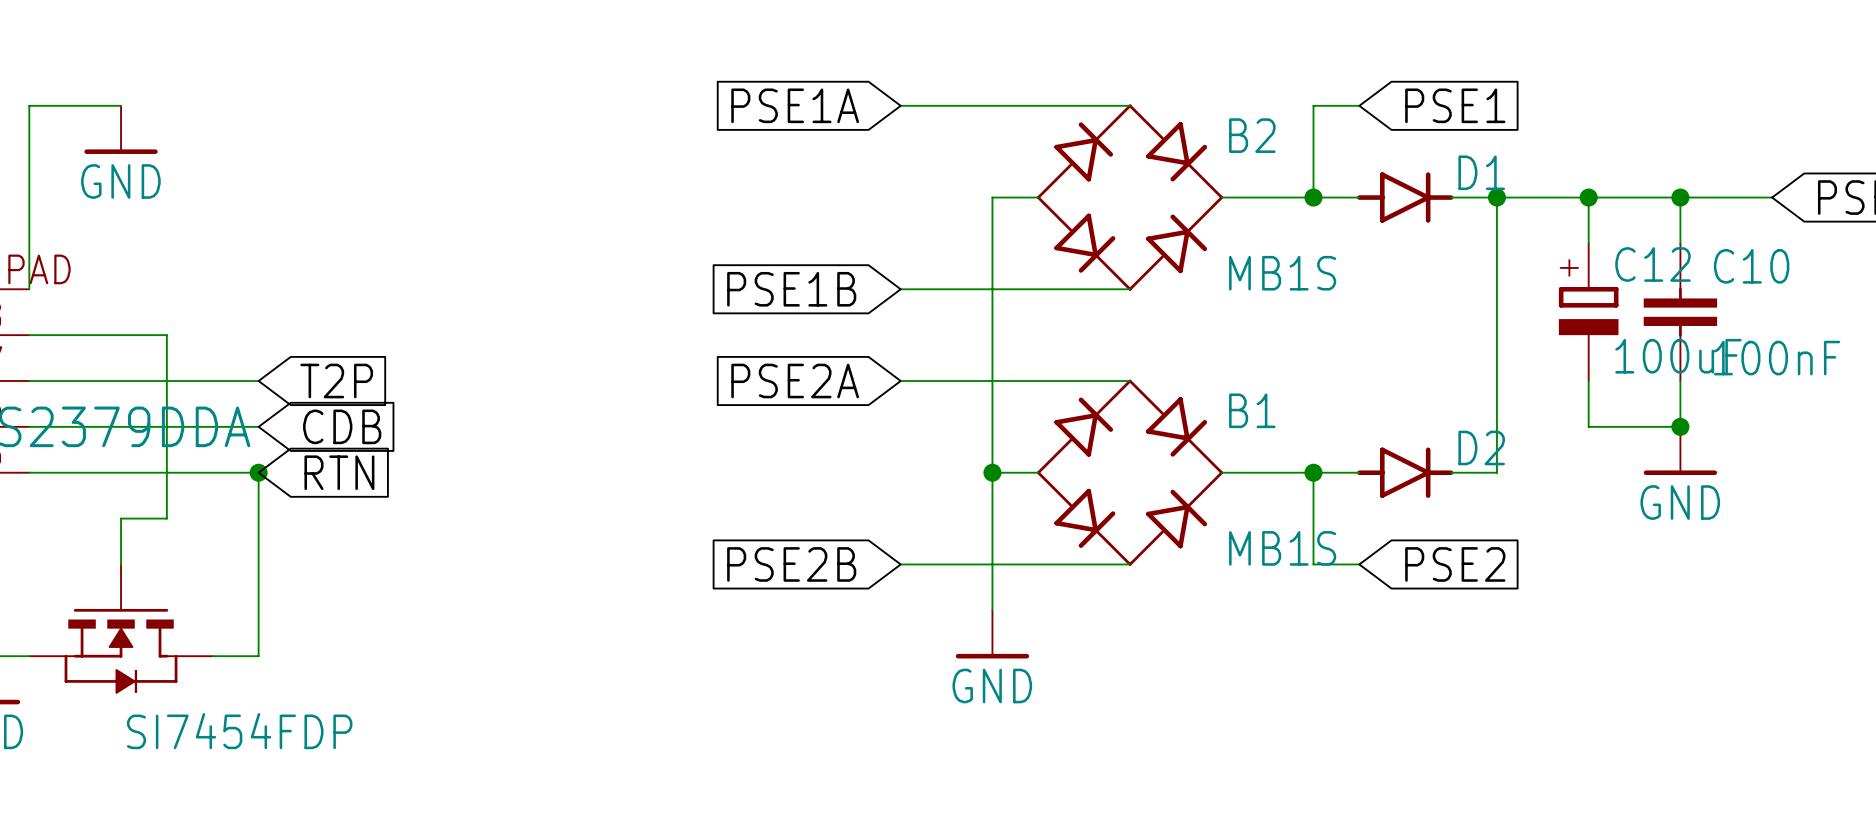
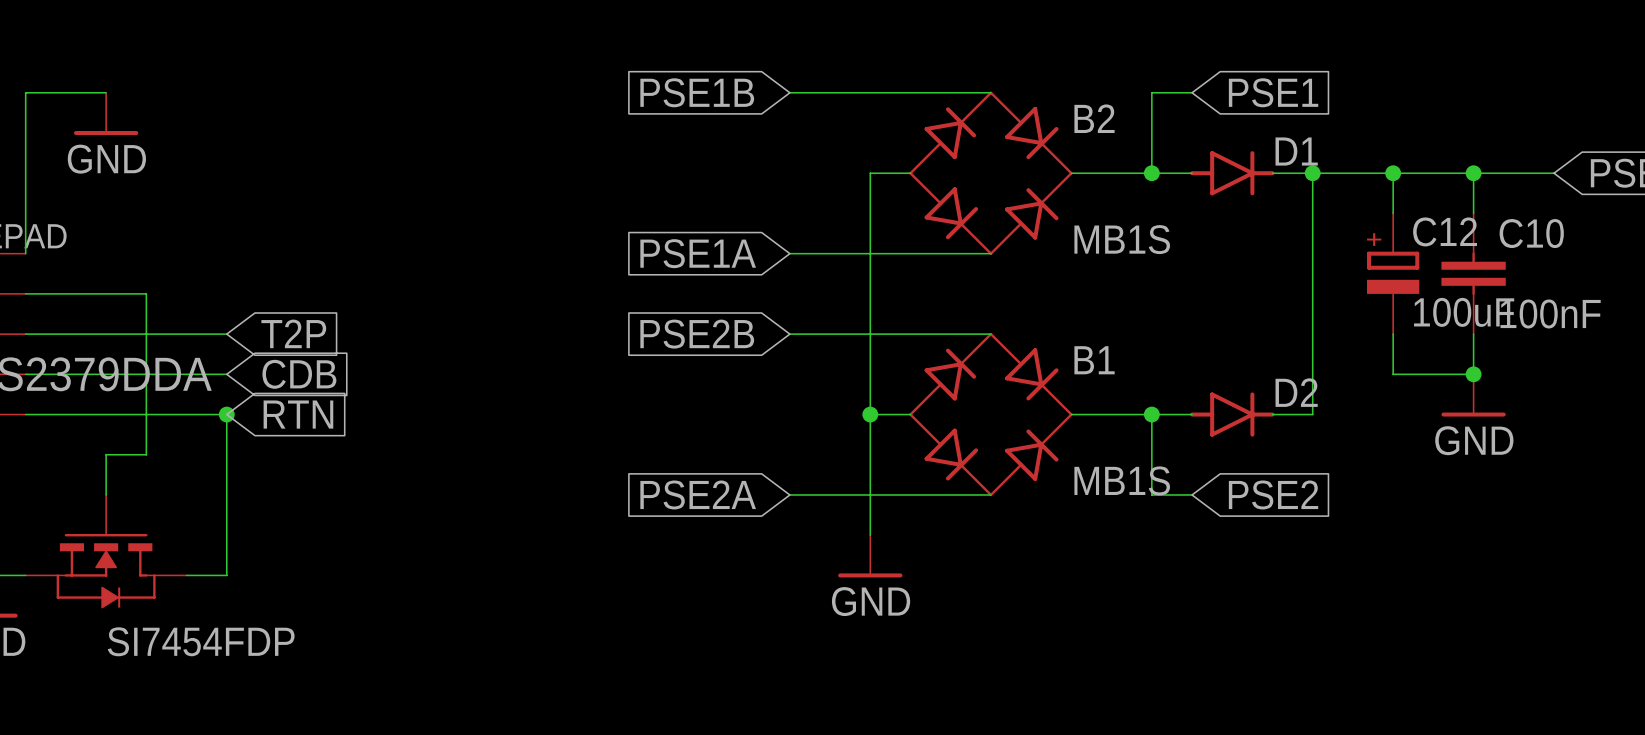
global label: PSE1A (795, 105) -> PSE1B (697, 92)
global label: PSE1B (791, 289) -> PSE1A (698, 253)
global label: PSE2A (795, 381) -> PSE2B (697, 334)
global label: PSE2B (791, 564) -> PSE2A (698, 494)

